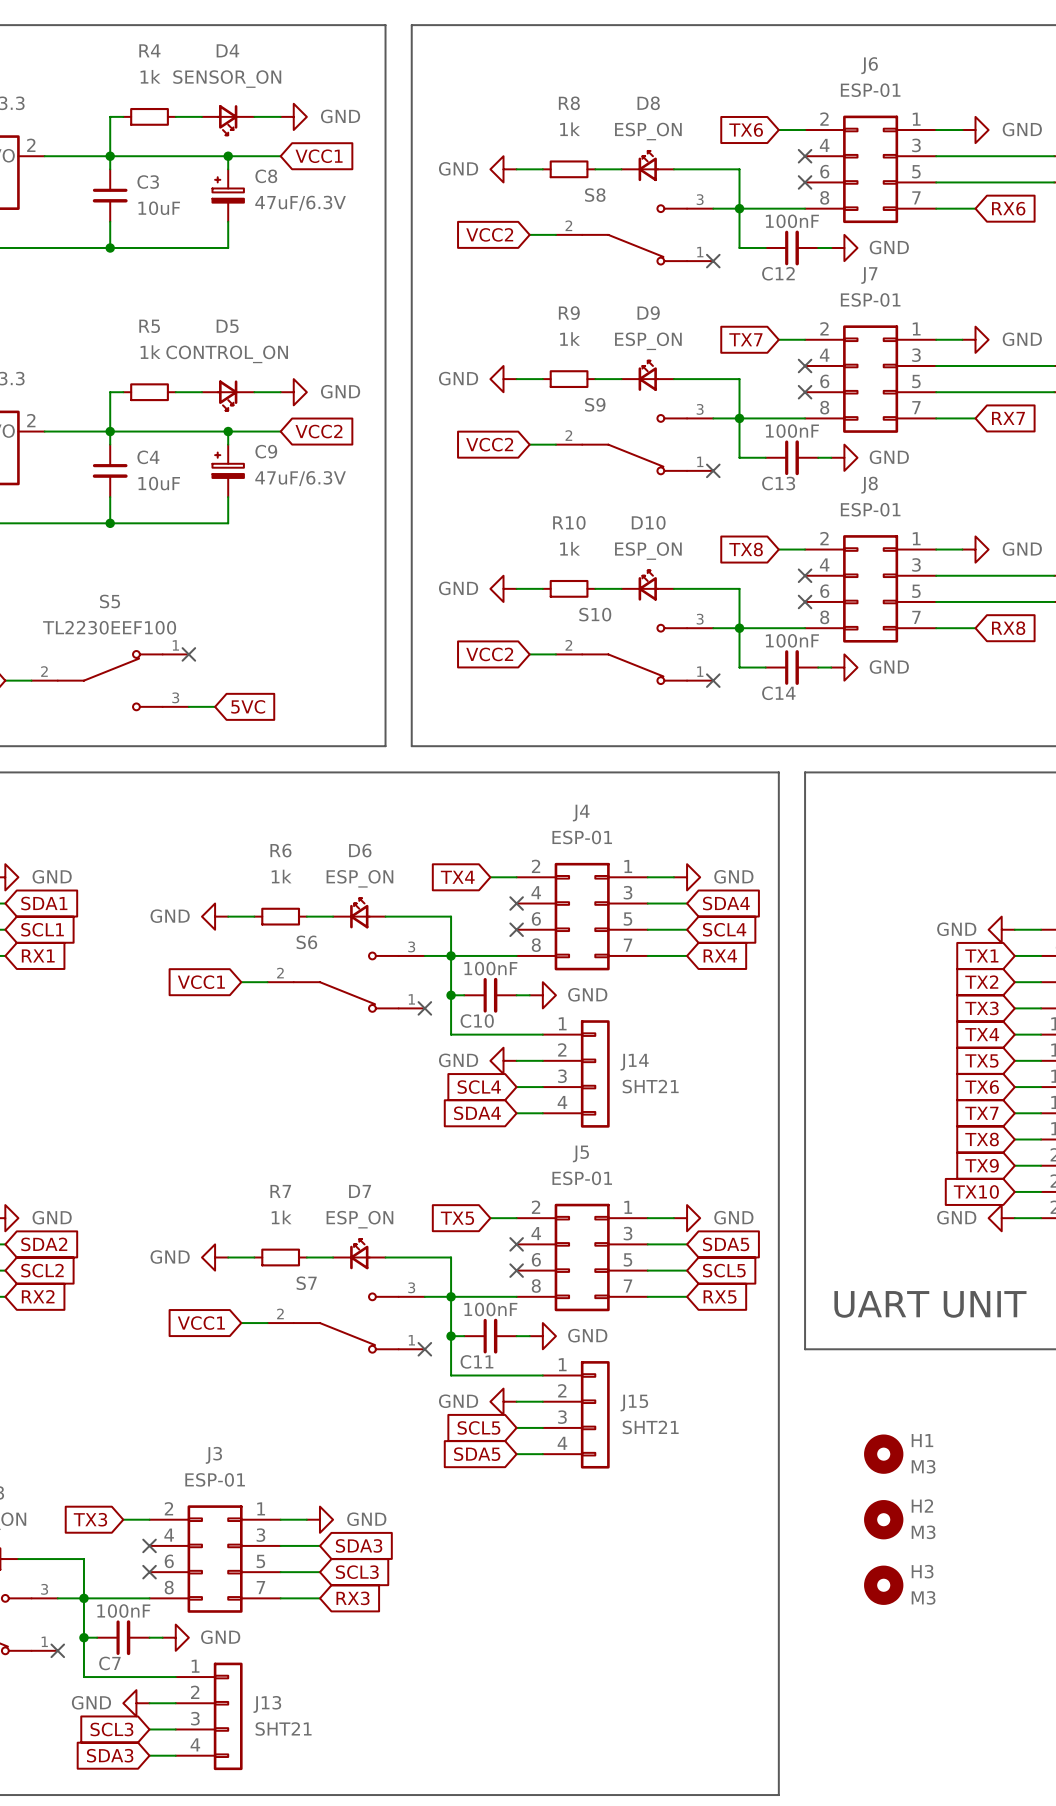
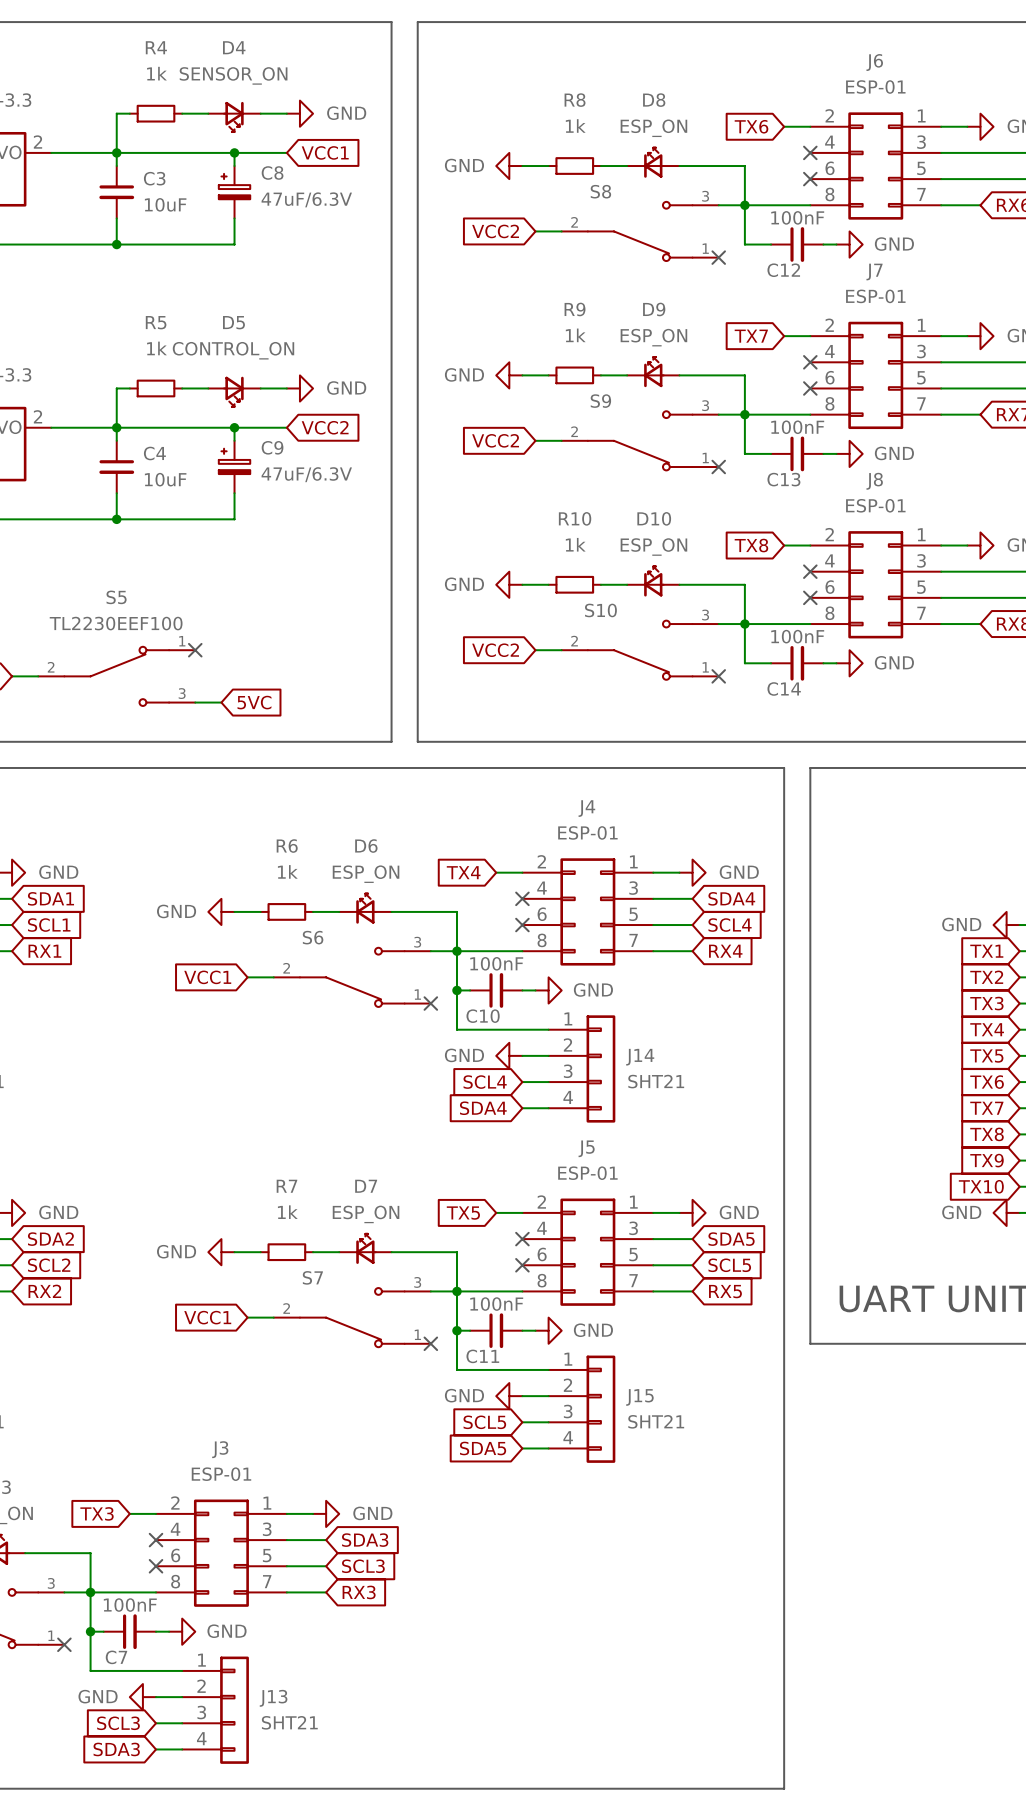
H1: M3 (883, 1454) -> none
H2: M3 (883, 1519) -> none
H3: M3 (883, 1585) -> none

